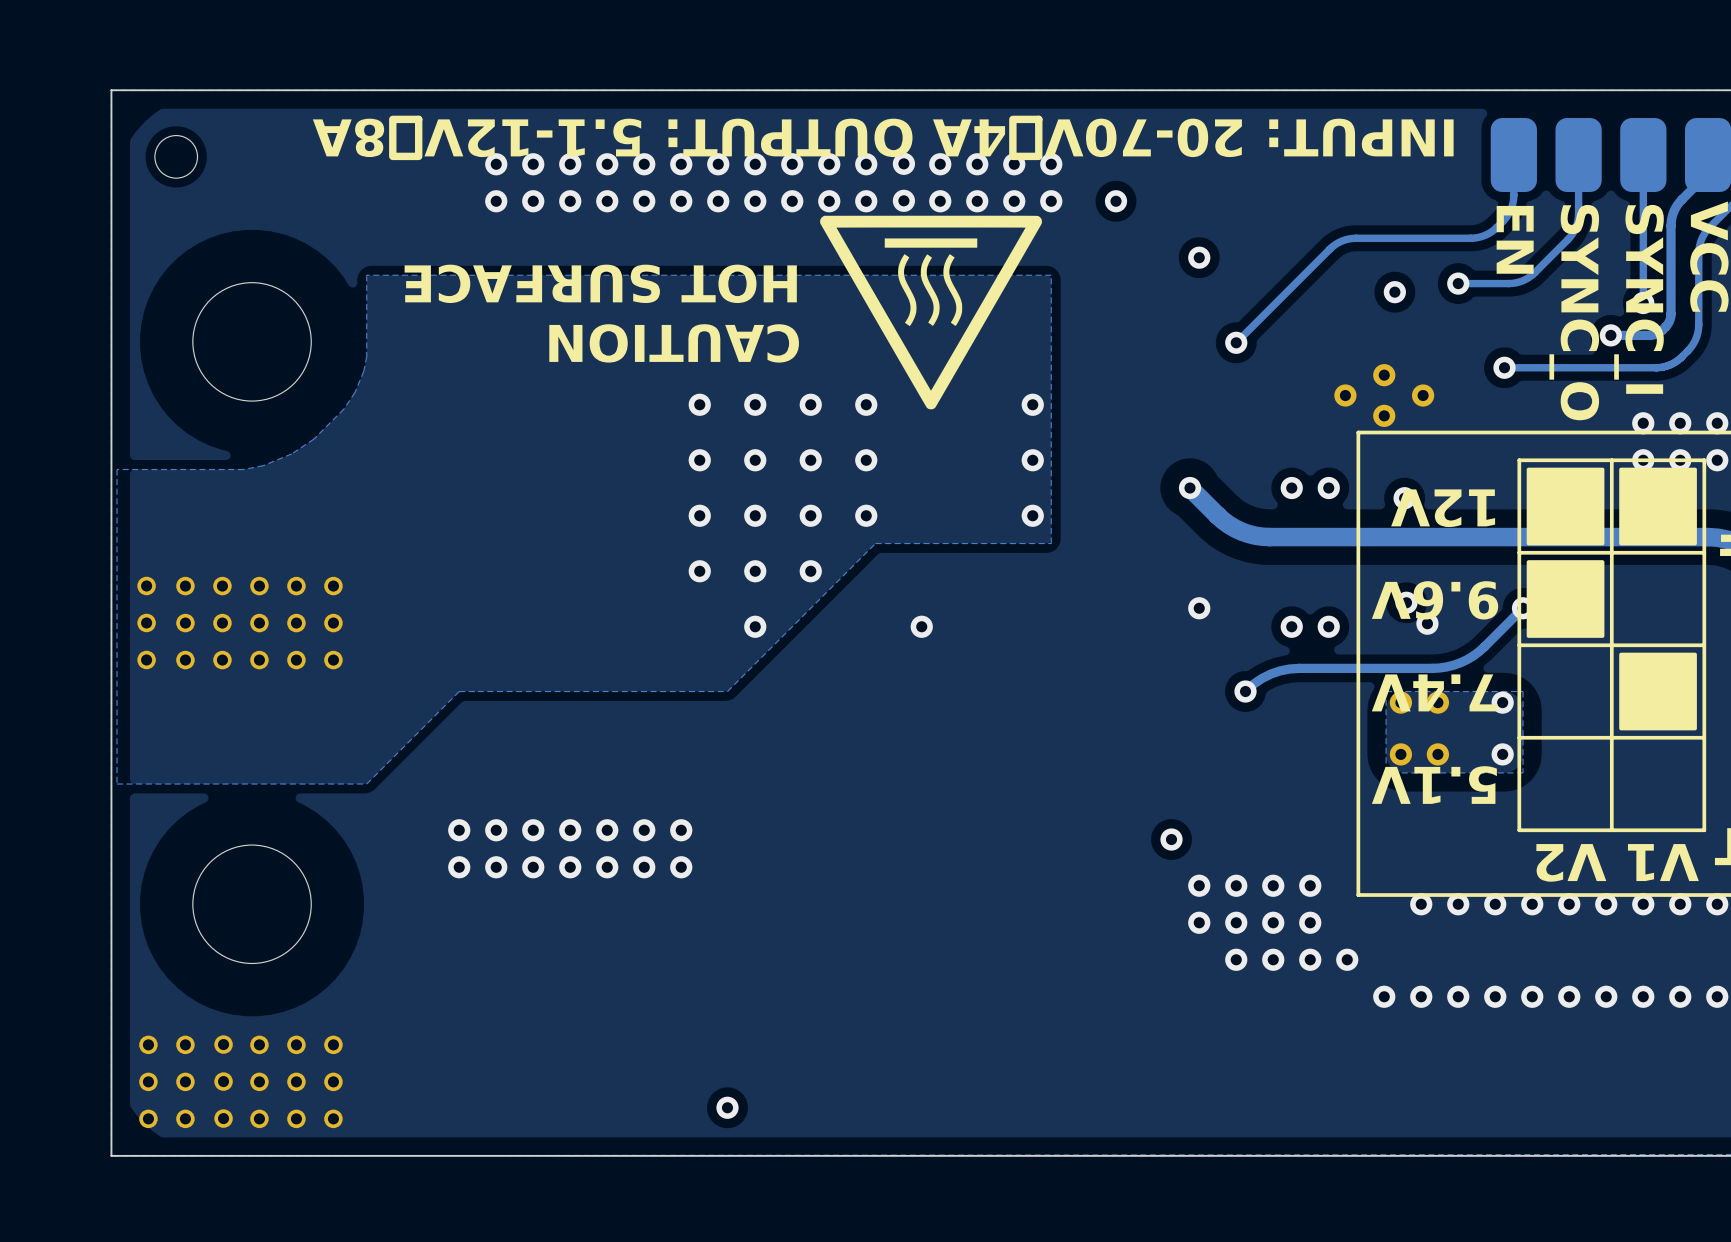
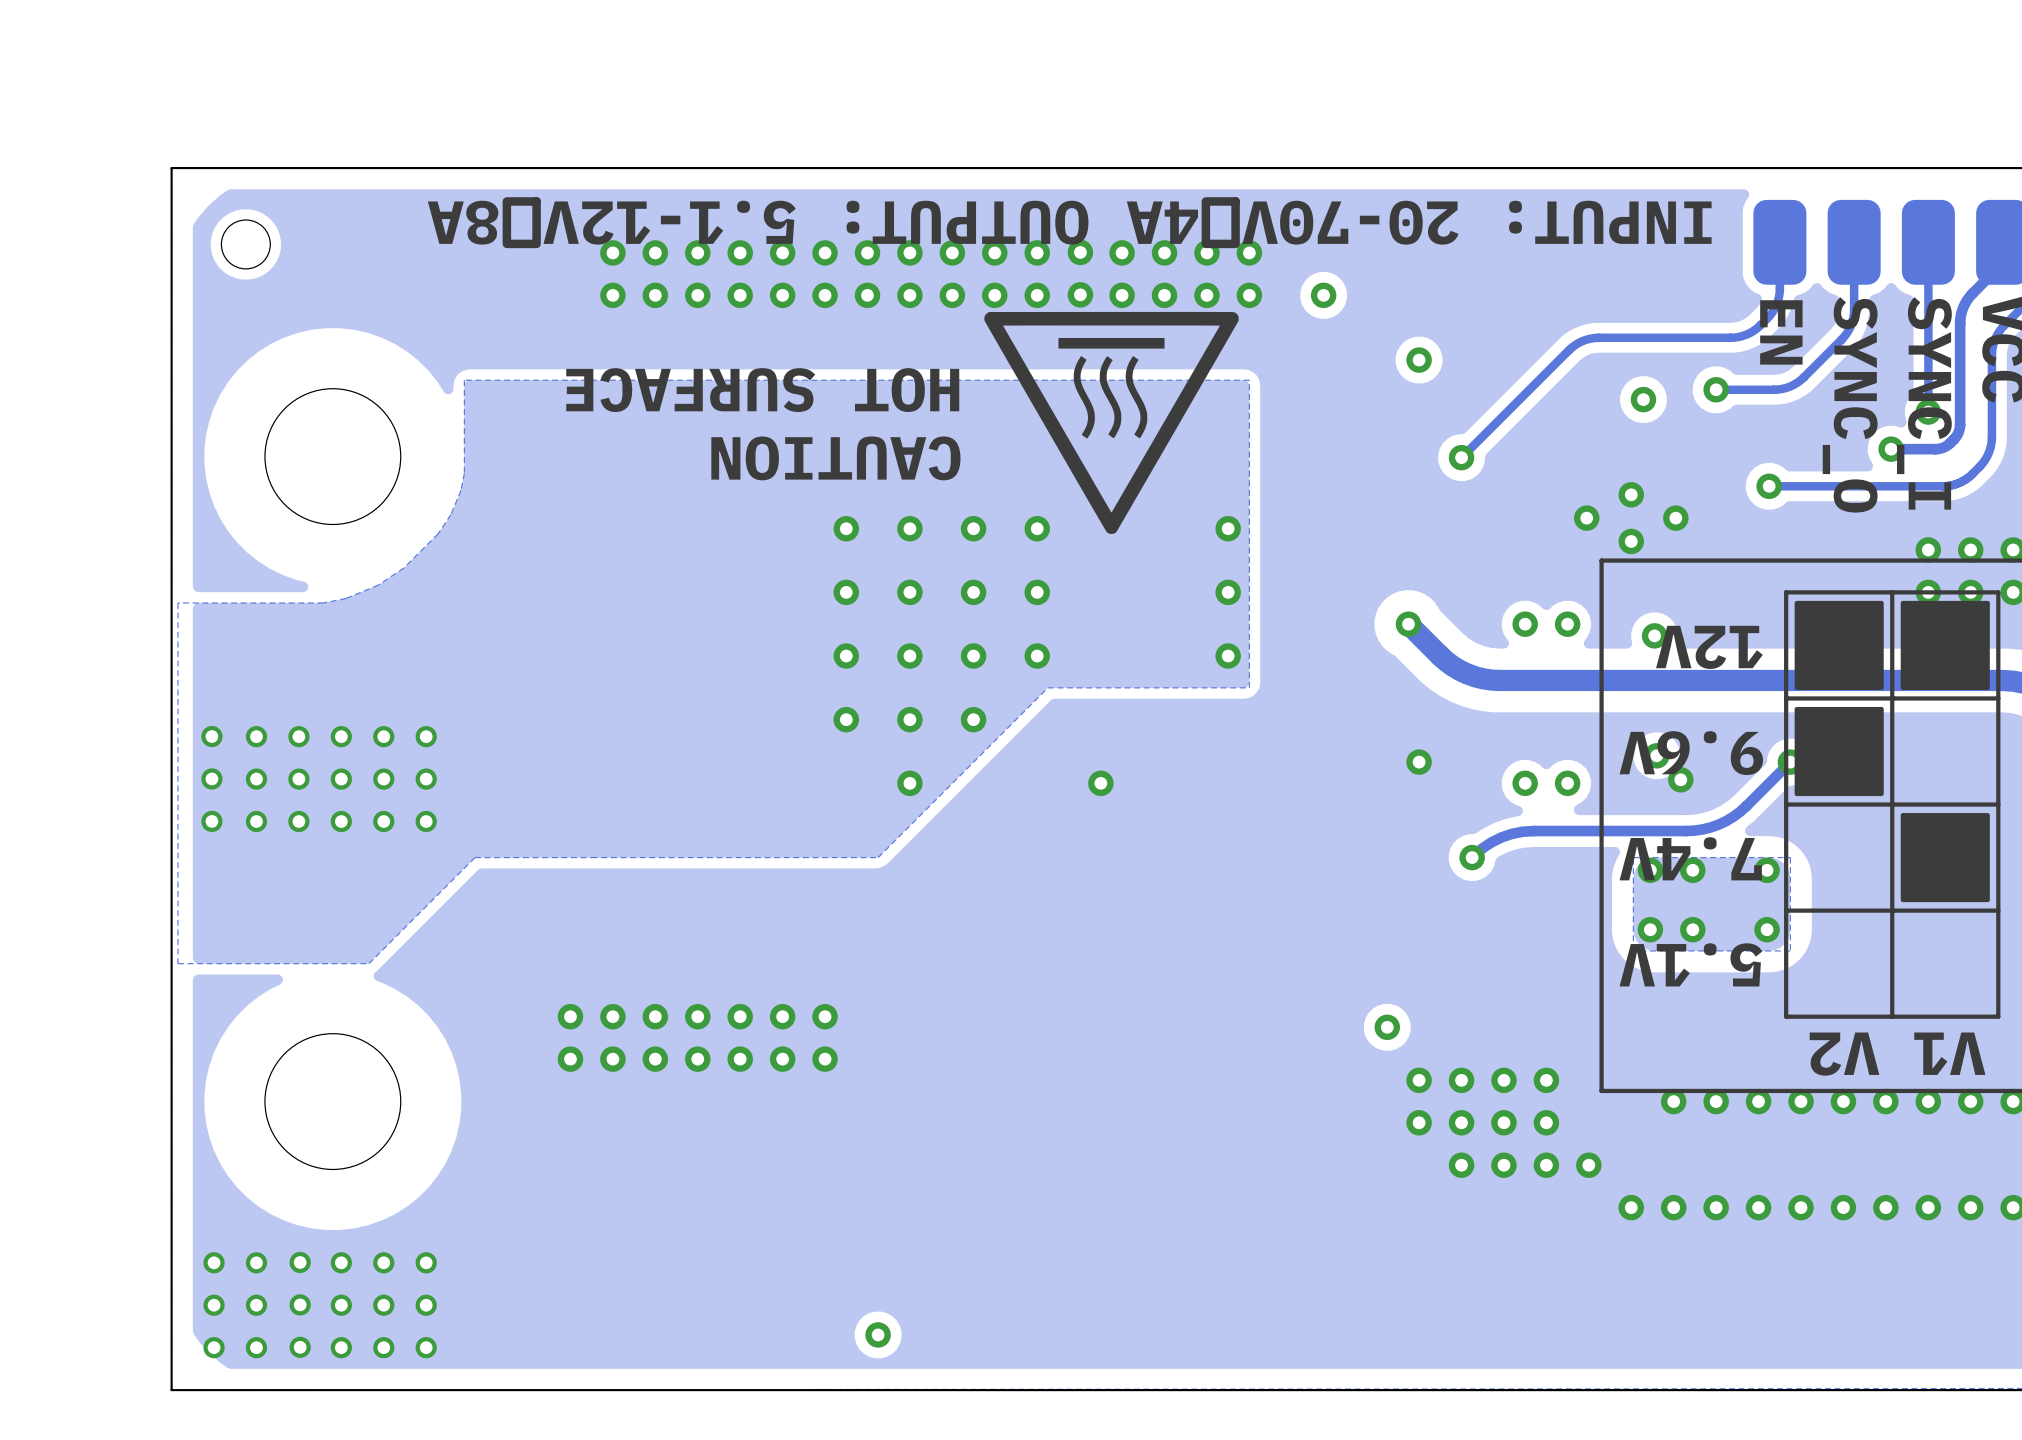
zone outline: (459, 691) (366, 784) (283, 784) -> (570, 857) (475, 857) (368, 963)

